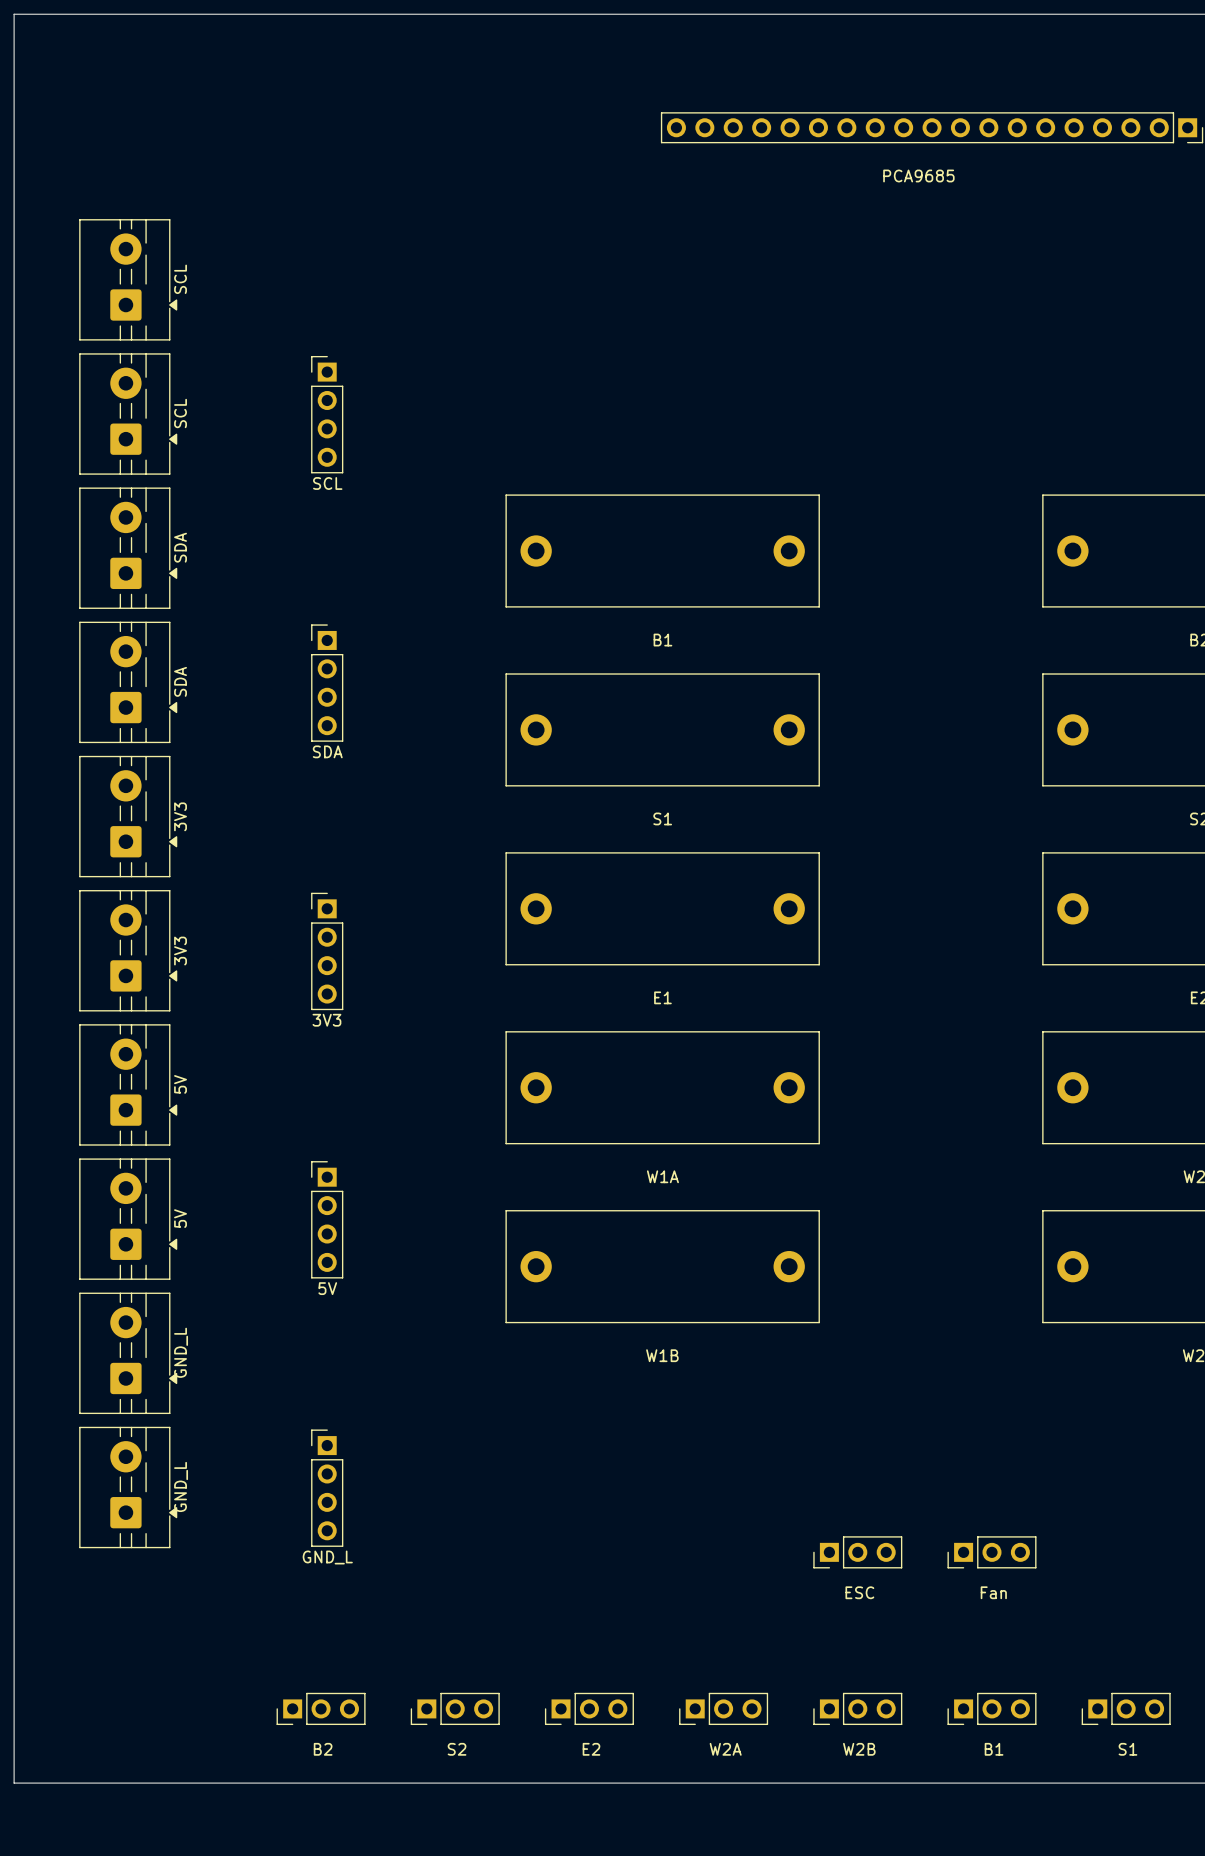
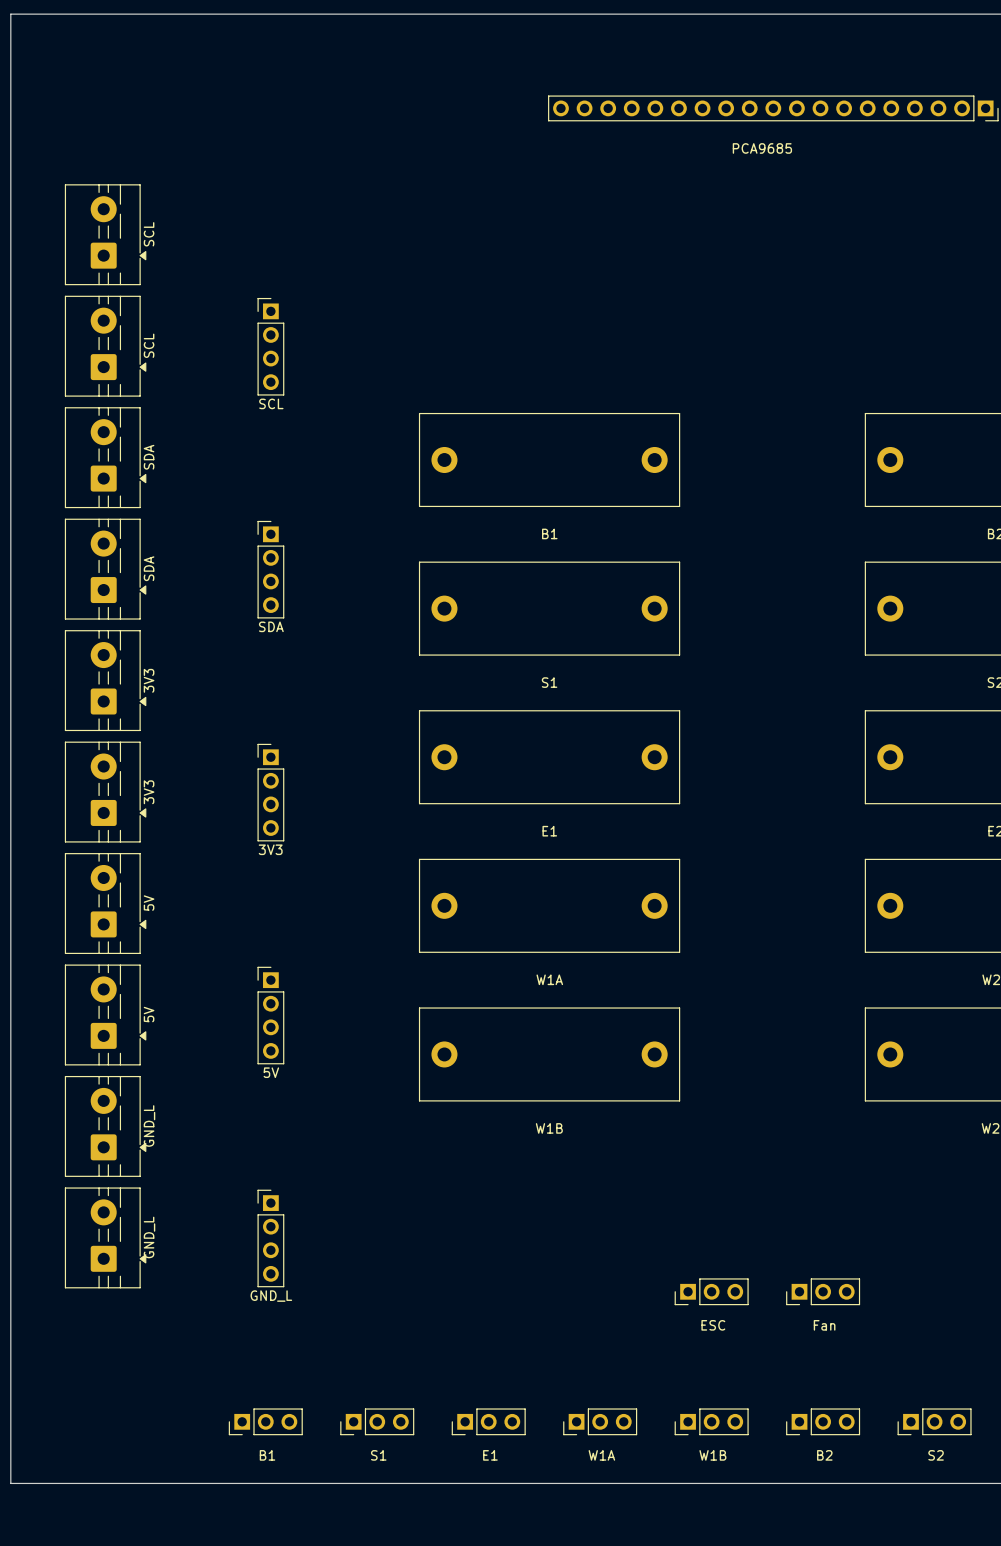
part value: B2 (323, 1749) -> B1 (267, 1455)
part value: S2 (457, 1749) -> S1 (378, 1455)
part value: E2 (591, 1749) -> E1 (490, 1455)
part value: W2A (725, 1749) -> W1A (601, 1455)
part value: W2B (859, 1749) -> W1B (712, 1455)
part value: B1 (994, 1749) -> B2 (824, 1455)
part value: S1 (1127, 1749) -> S2 (936, 1455)

